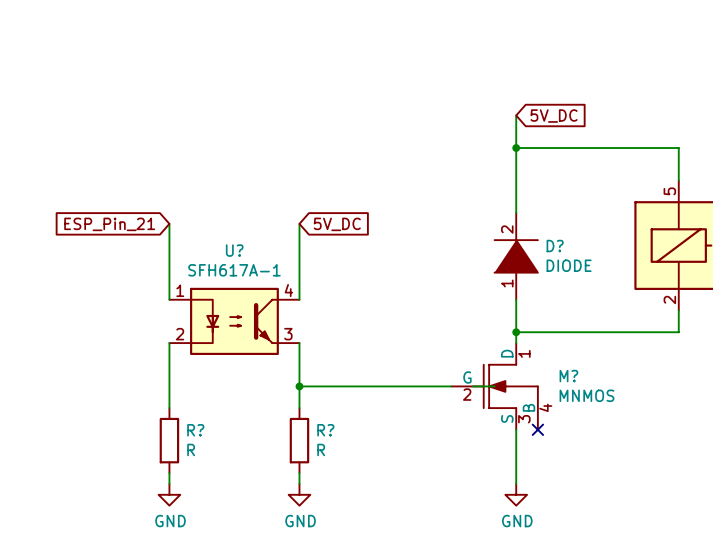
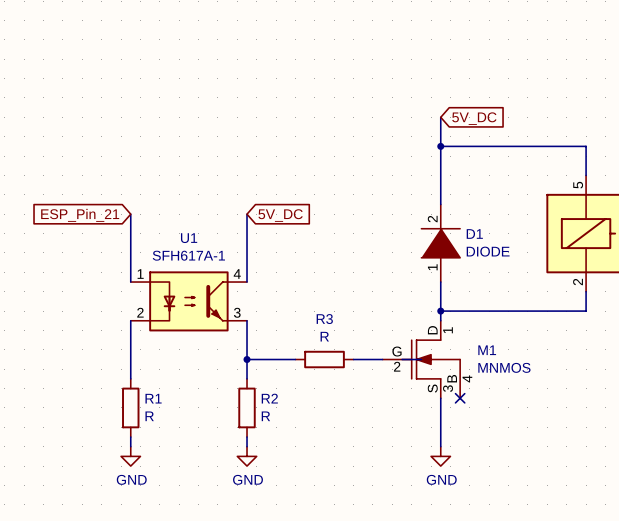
D? name: D? (555, 246) -> D1 (474, 233)
U? name: U? (234, 250) -> U1 (189, 238)
M? name: M? (568, 376) -> M1 (487, 350)
wire: (353, 386) (418, 386) -> none
R3: none -> R (324, 359)
R? name: R? (195, 430) -> R1 (153, 398)
R? name: R? (325, 430) -> R2 (269, 398)

